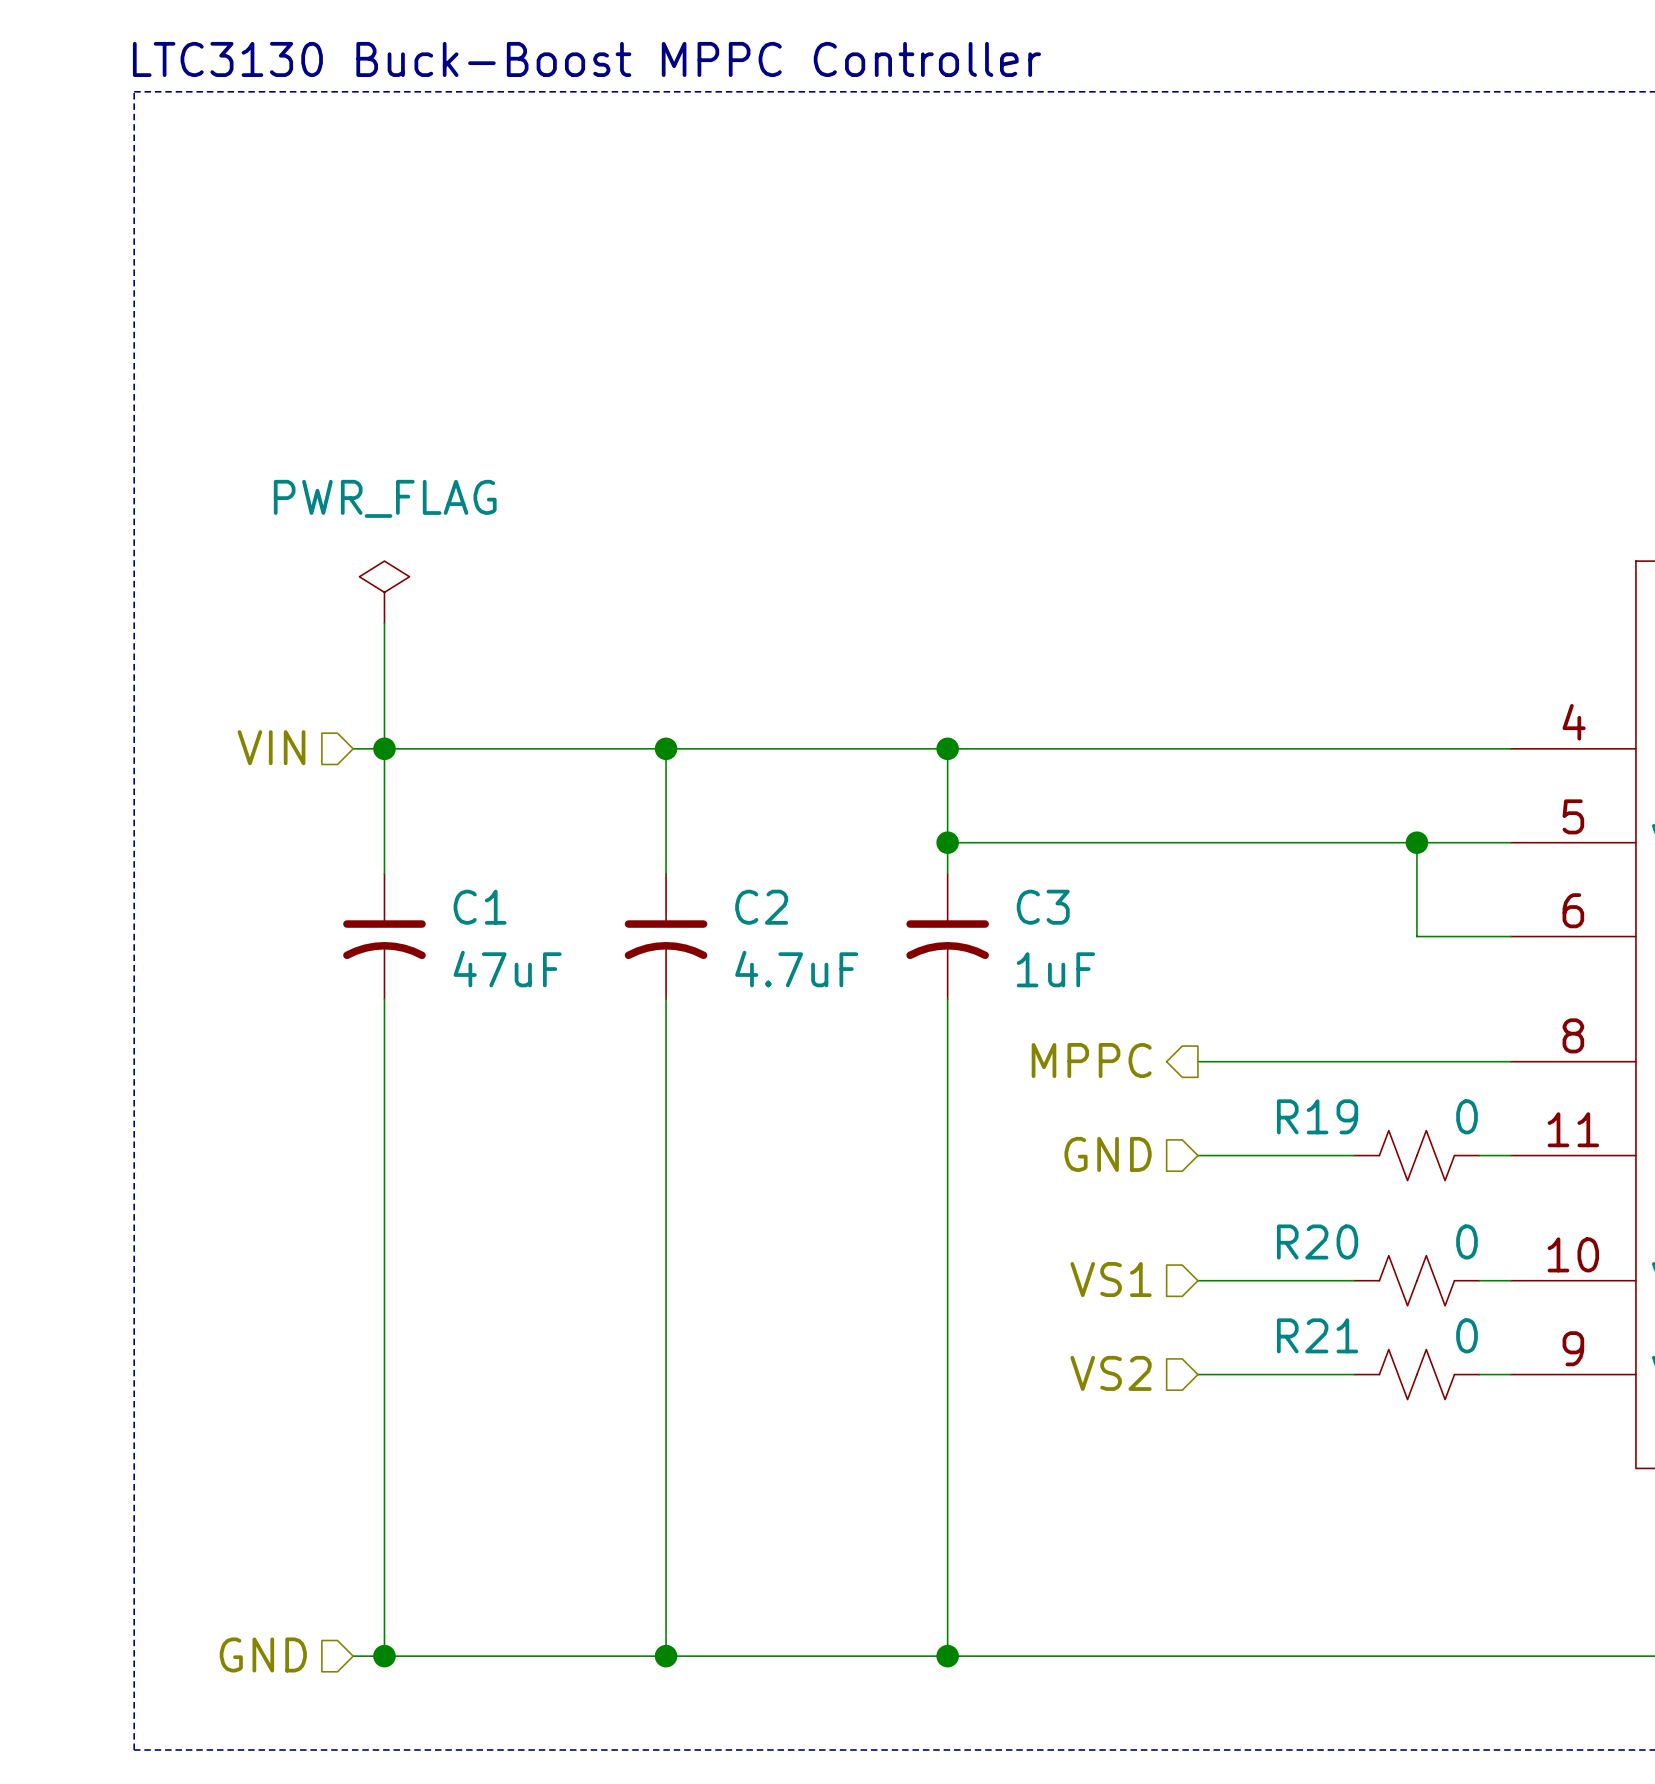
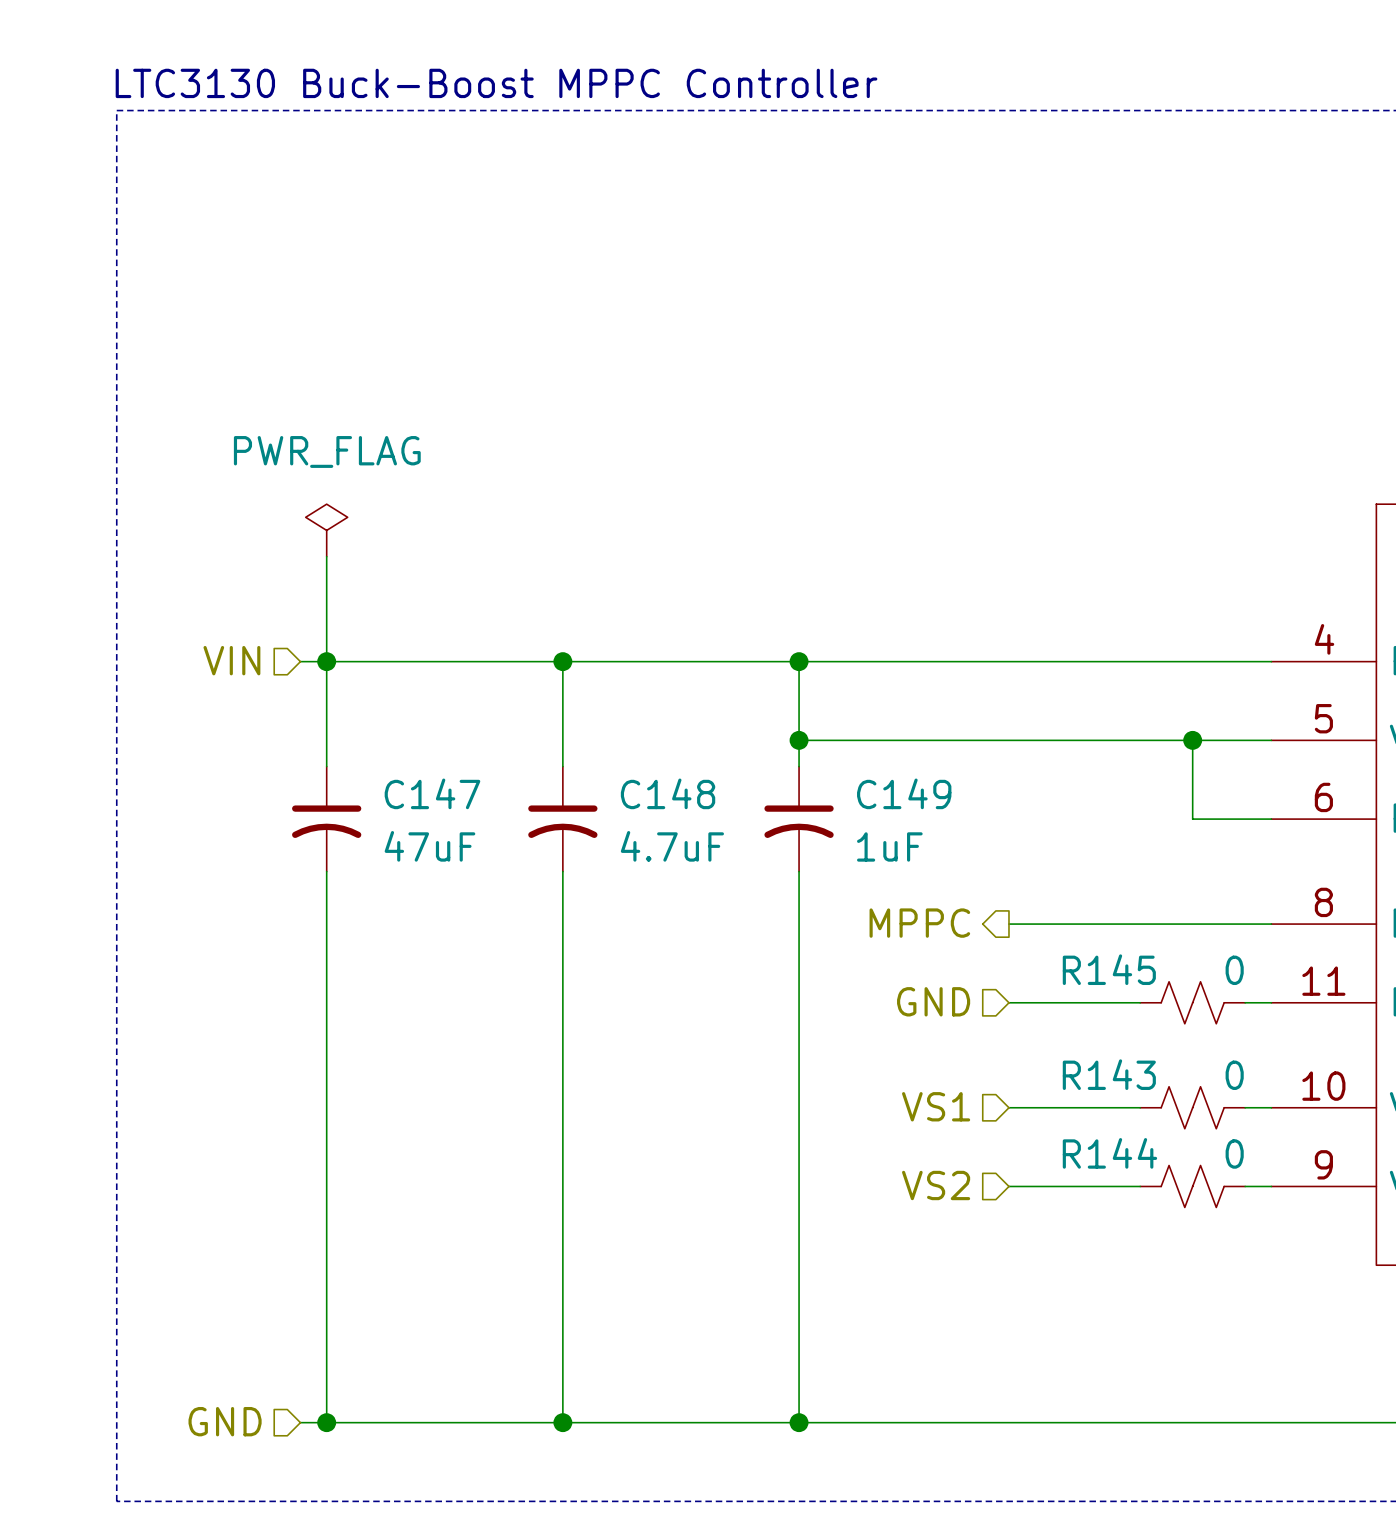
C1 name: C1 (480, 907) -> C147 (432, 793)
C2 name: C2 (761, 907) -> C148 (668, 793)
C3 name: C3 (1043, 907) -> C149 (904, 793)
R19 name: R19 (1317, 1116) -> R145 (1109, 969)
R20 name: R20 (1317, 1241) -> R143 (1109, 1074)
R21 name: R21 (1317, 1335) -> R144 (1109, 1153)

